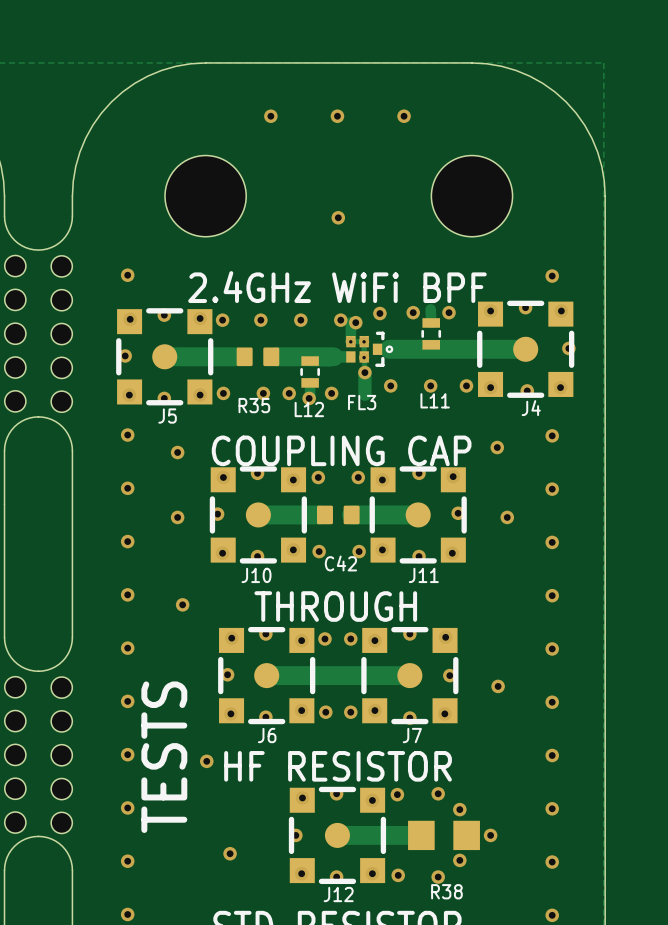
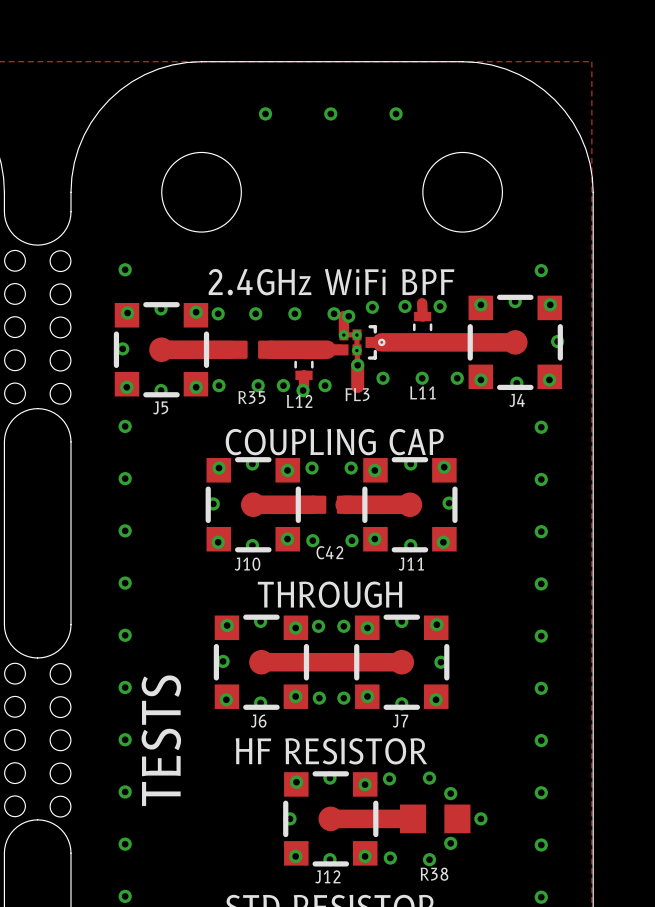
via: (338, 217) -> none
via: (497, 447) -> none
via: (177, 452) -> none
via: (177, 517) -> none
via: (507, 517) -> none
via: (182, 604) -> none
via: (498, 686) -> none
via: (206, 761) -> none
via: (230, 853) -> none

